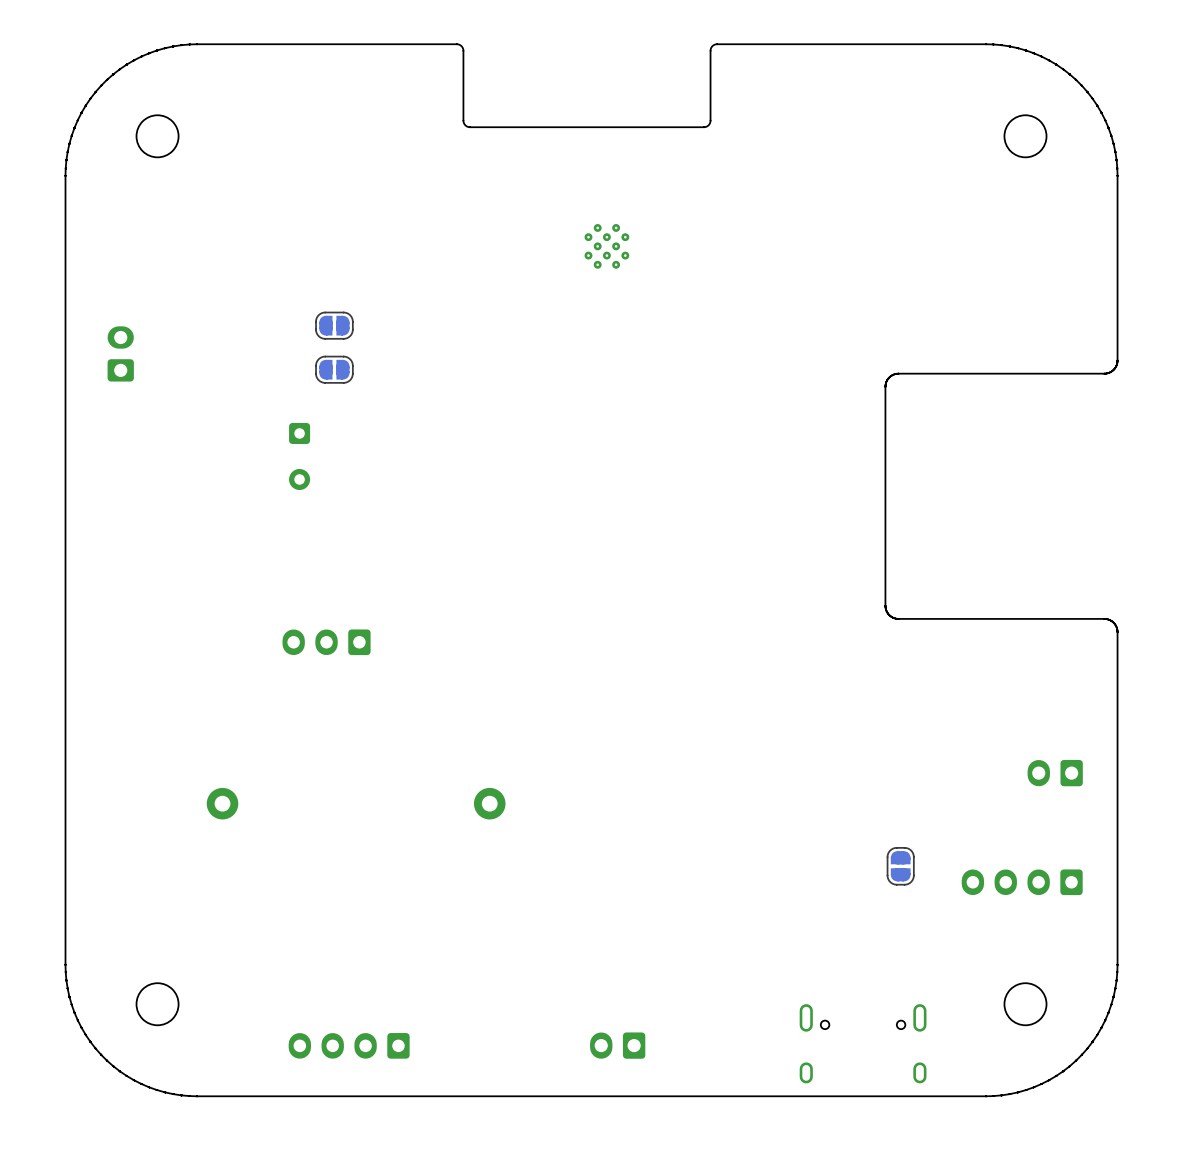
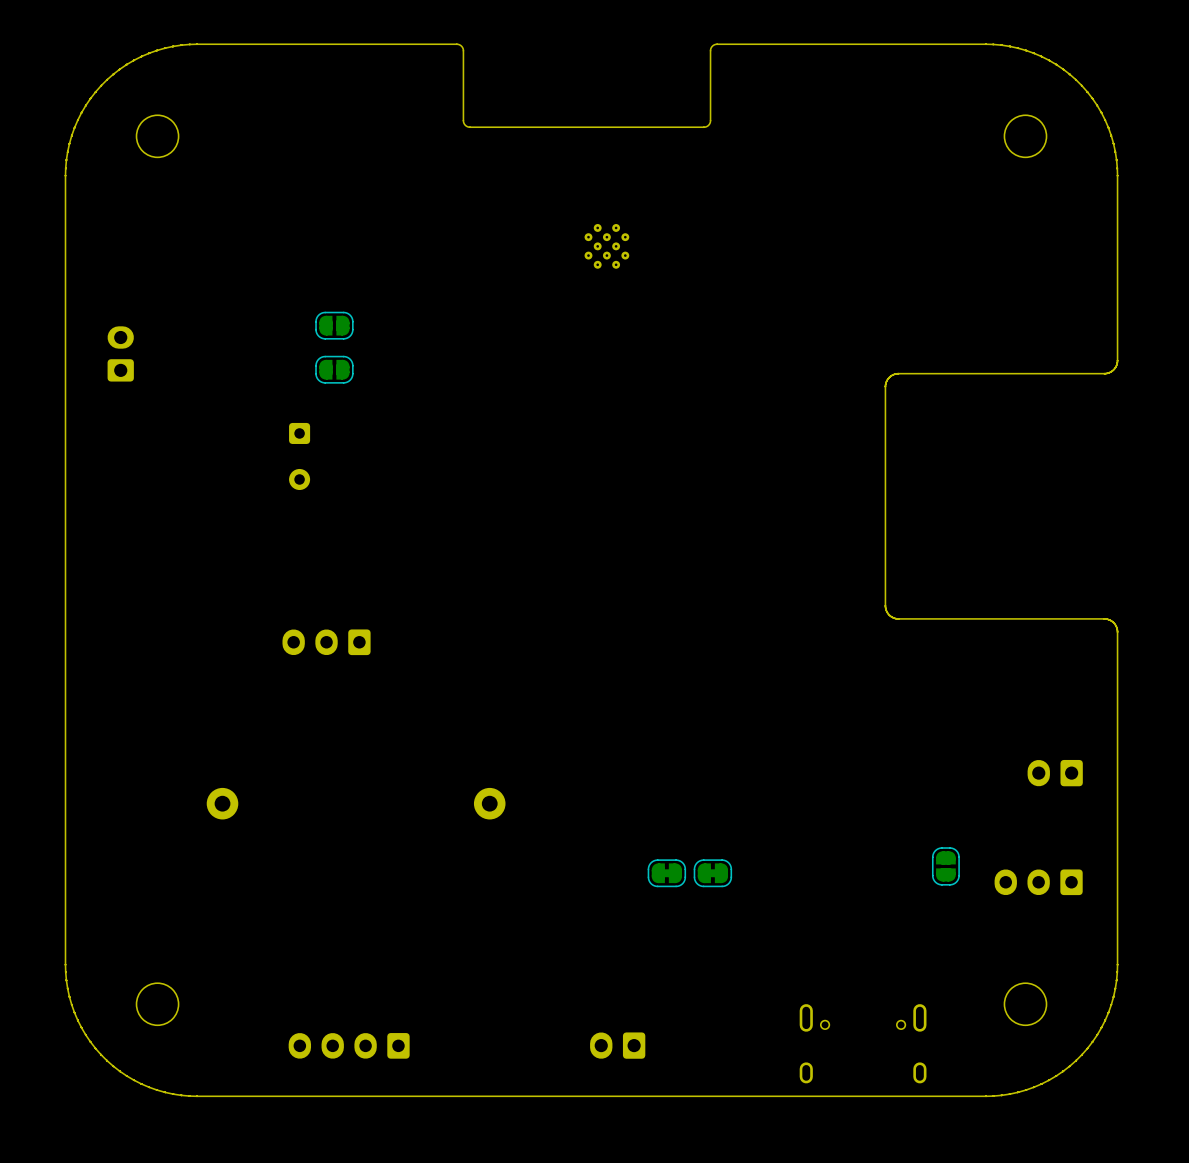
part position: (900, 866) -> (945, 866)
part: none -> (666, 873)
part: none -> (712, 873)
part: (1022, 882) -> none

